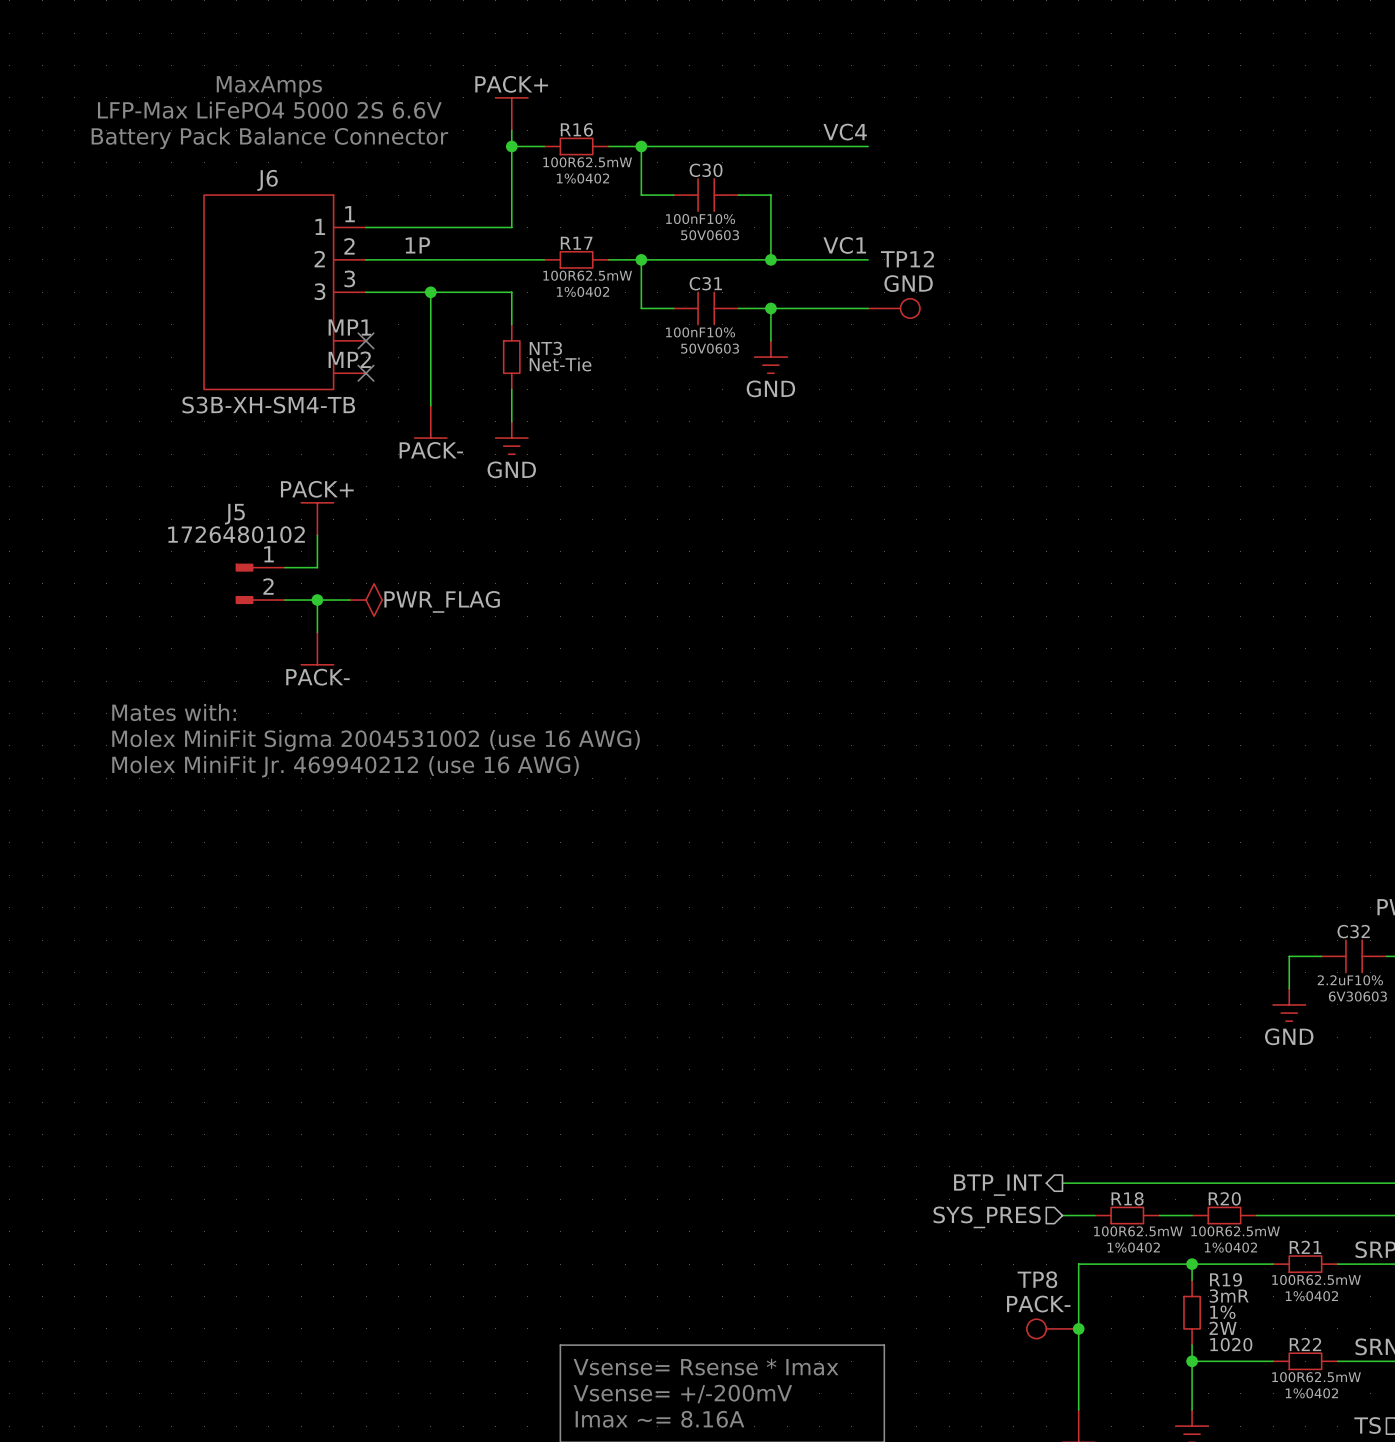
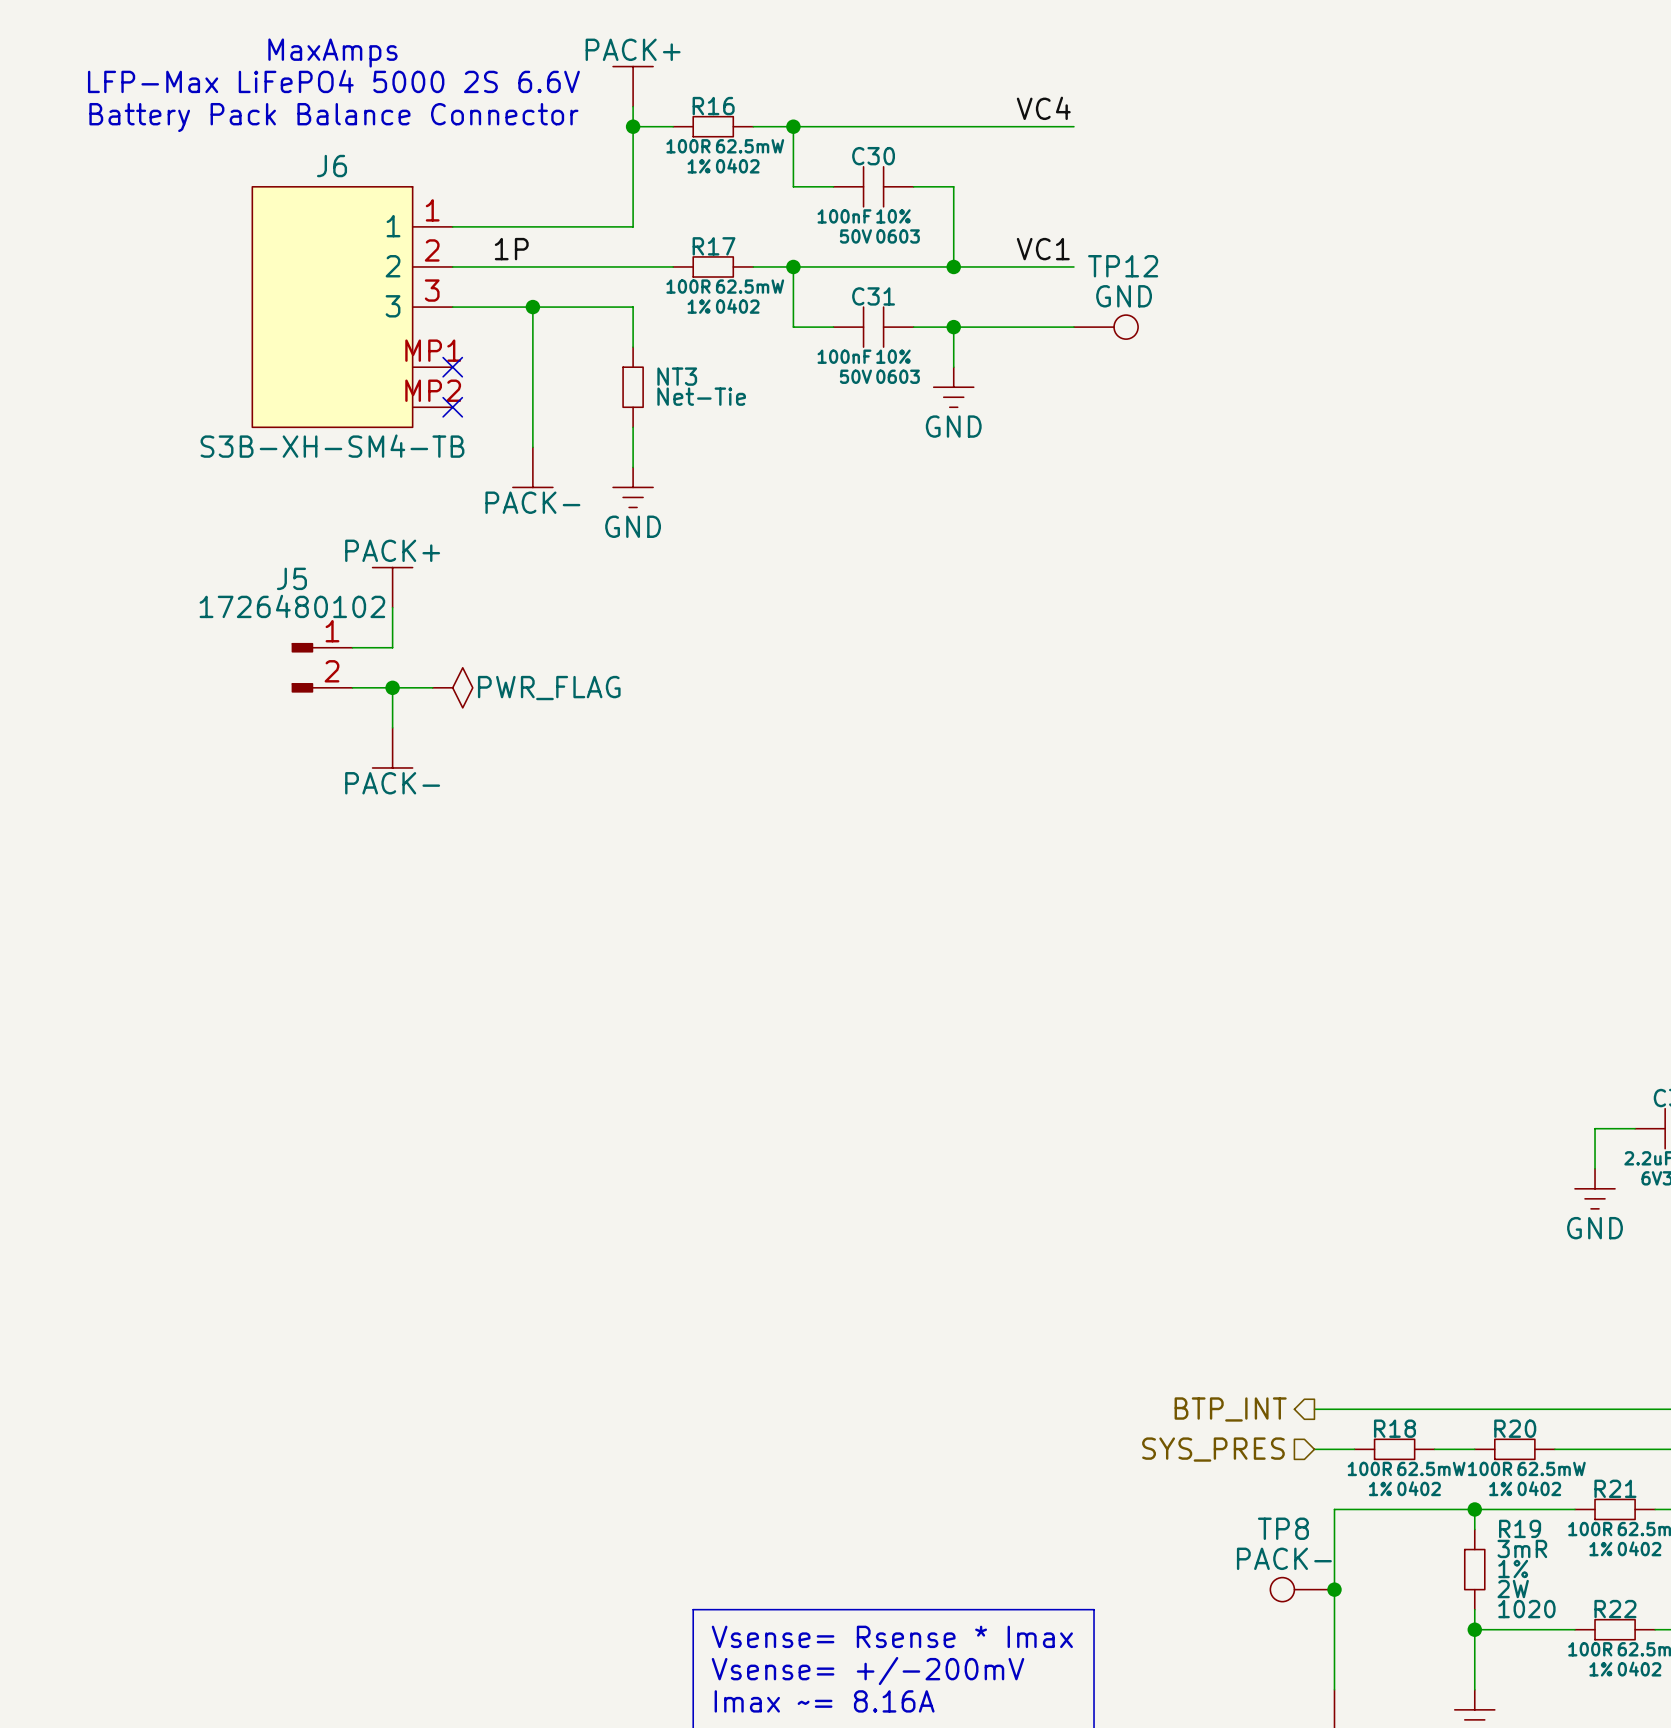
text: Mates with: (174, 712) -> none
text: Molex MiniFit Sigma 2004531002 (use 16 AWG) (376, 740) -> none
text: Molex MiniFit Jr. 469940212 (use 16 AWG) (345, 766) -> none

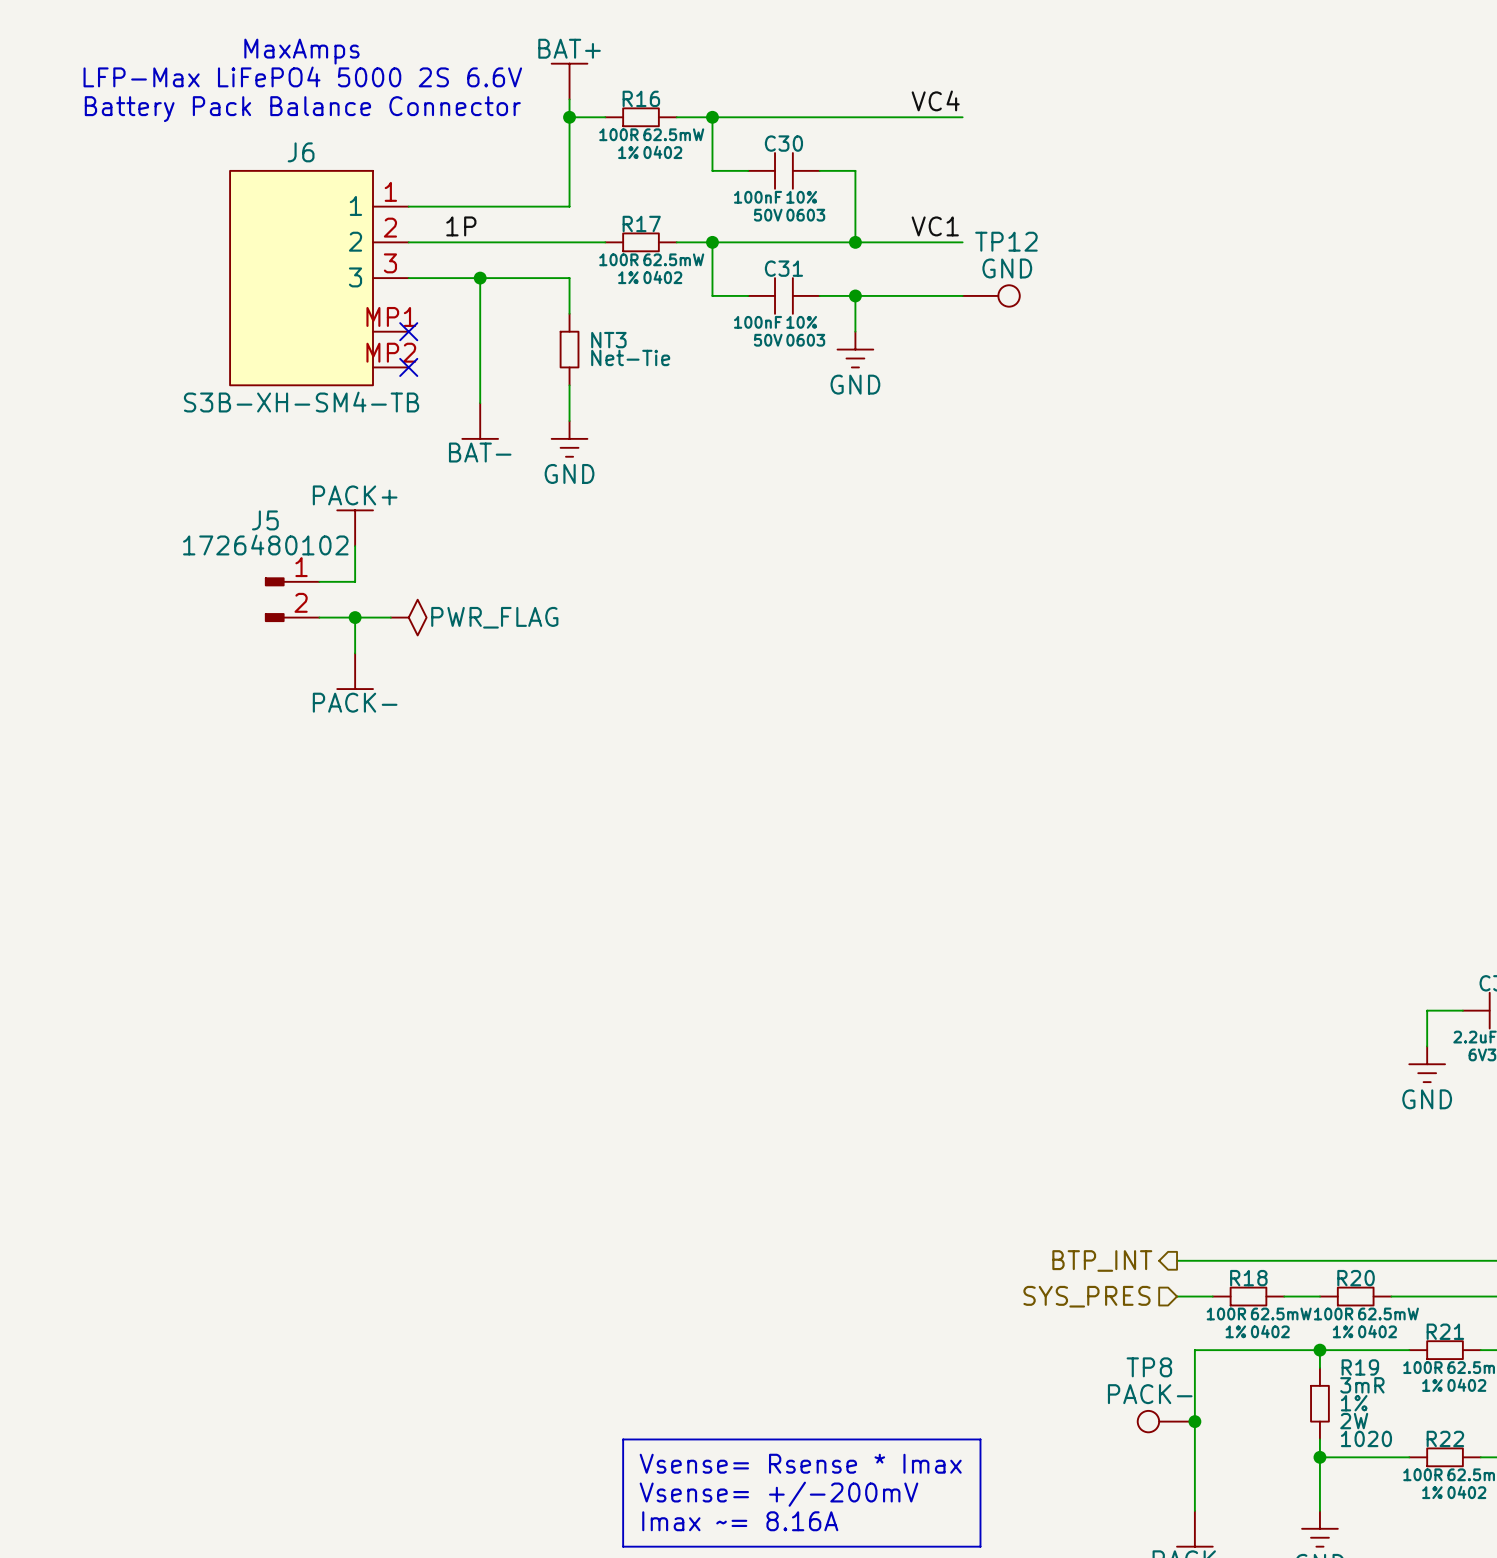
power symbol: PACK+ (633, 86) -> BAT+ (569, 81)
power symbol: PACK- (532, 467) -> BAT- (480, 421)

